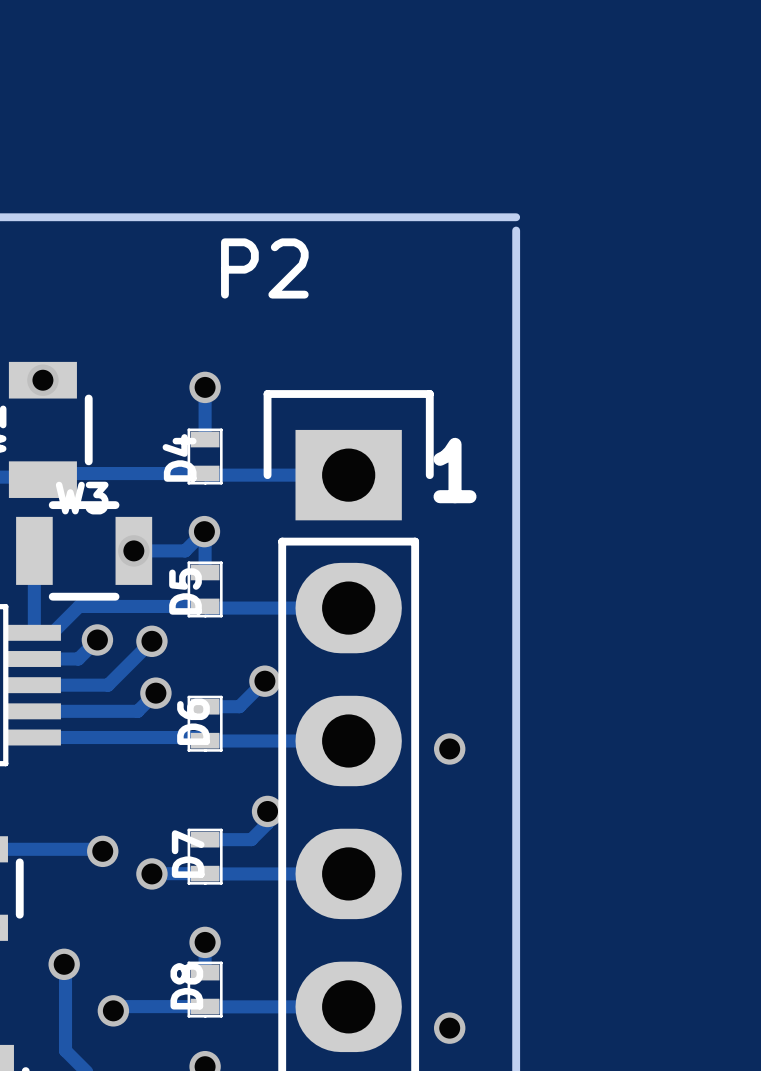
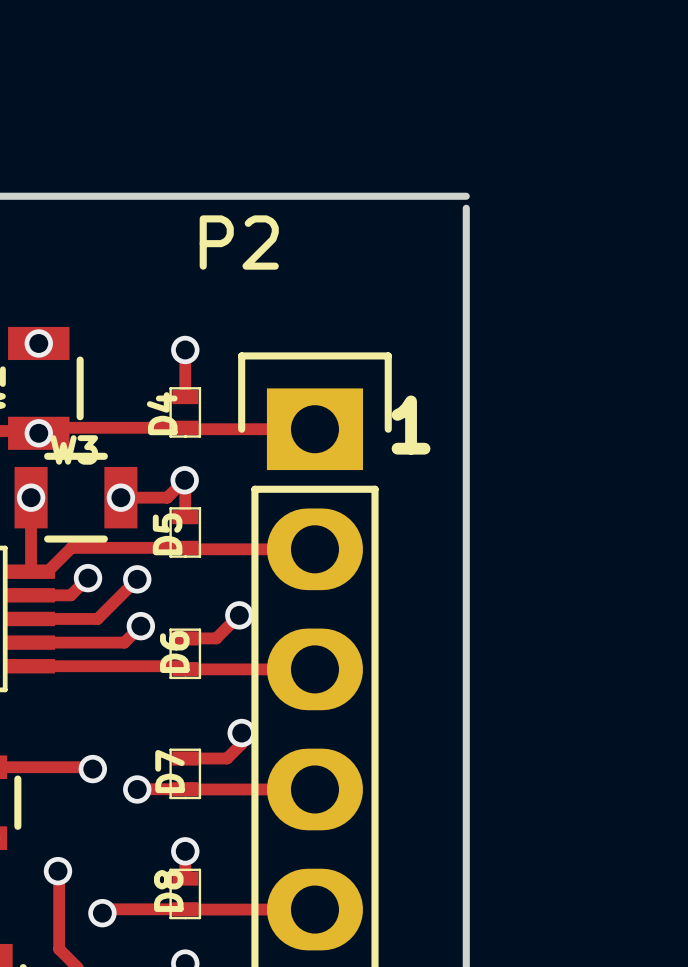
via: none -> (38, 433)
via: none -> (31, 497)
via: (449, 748) -> none
via: (449, 1028) -> none

